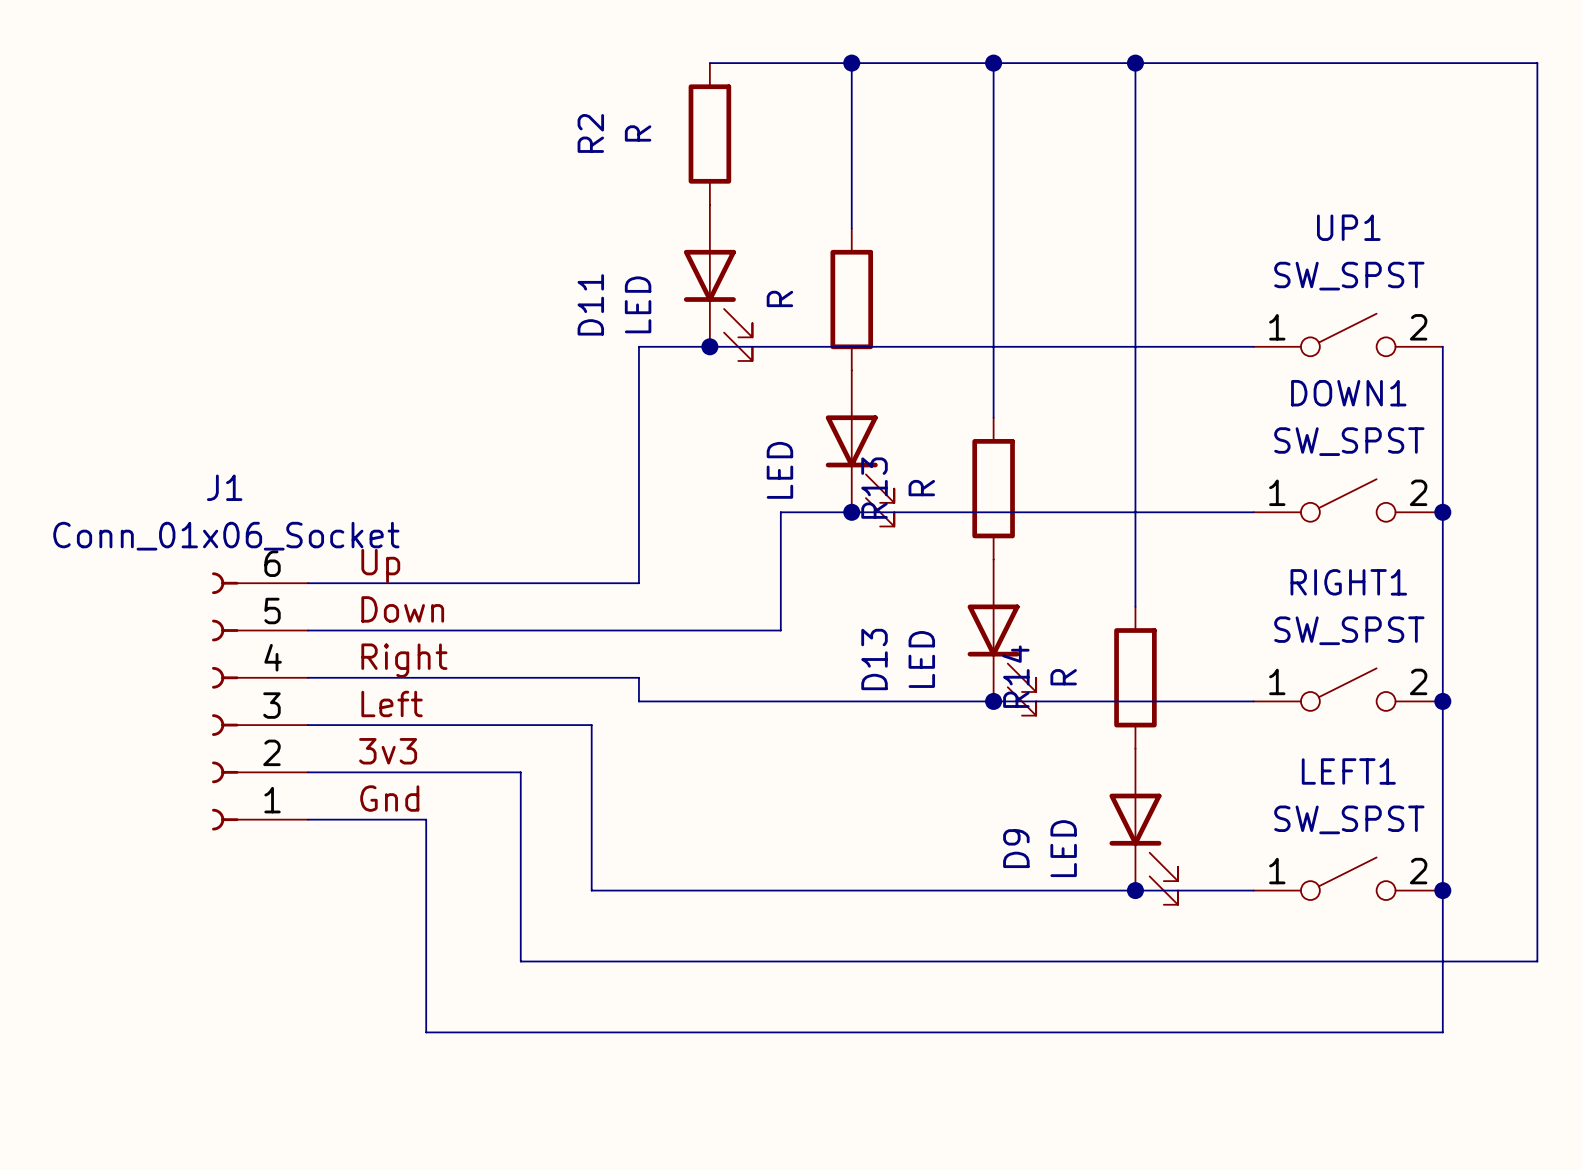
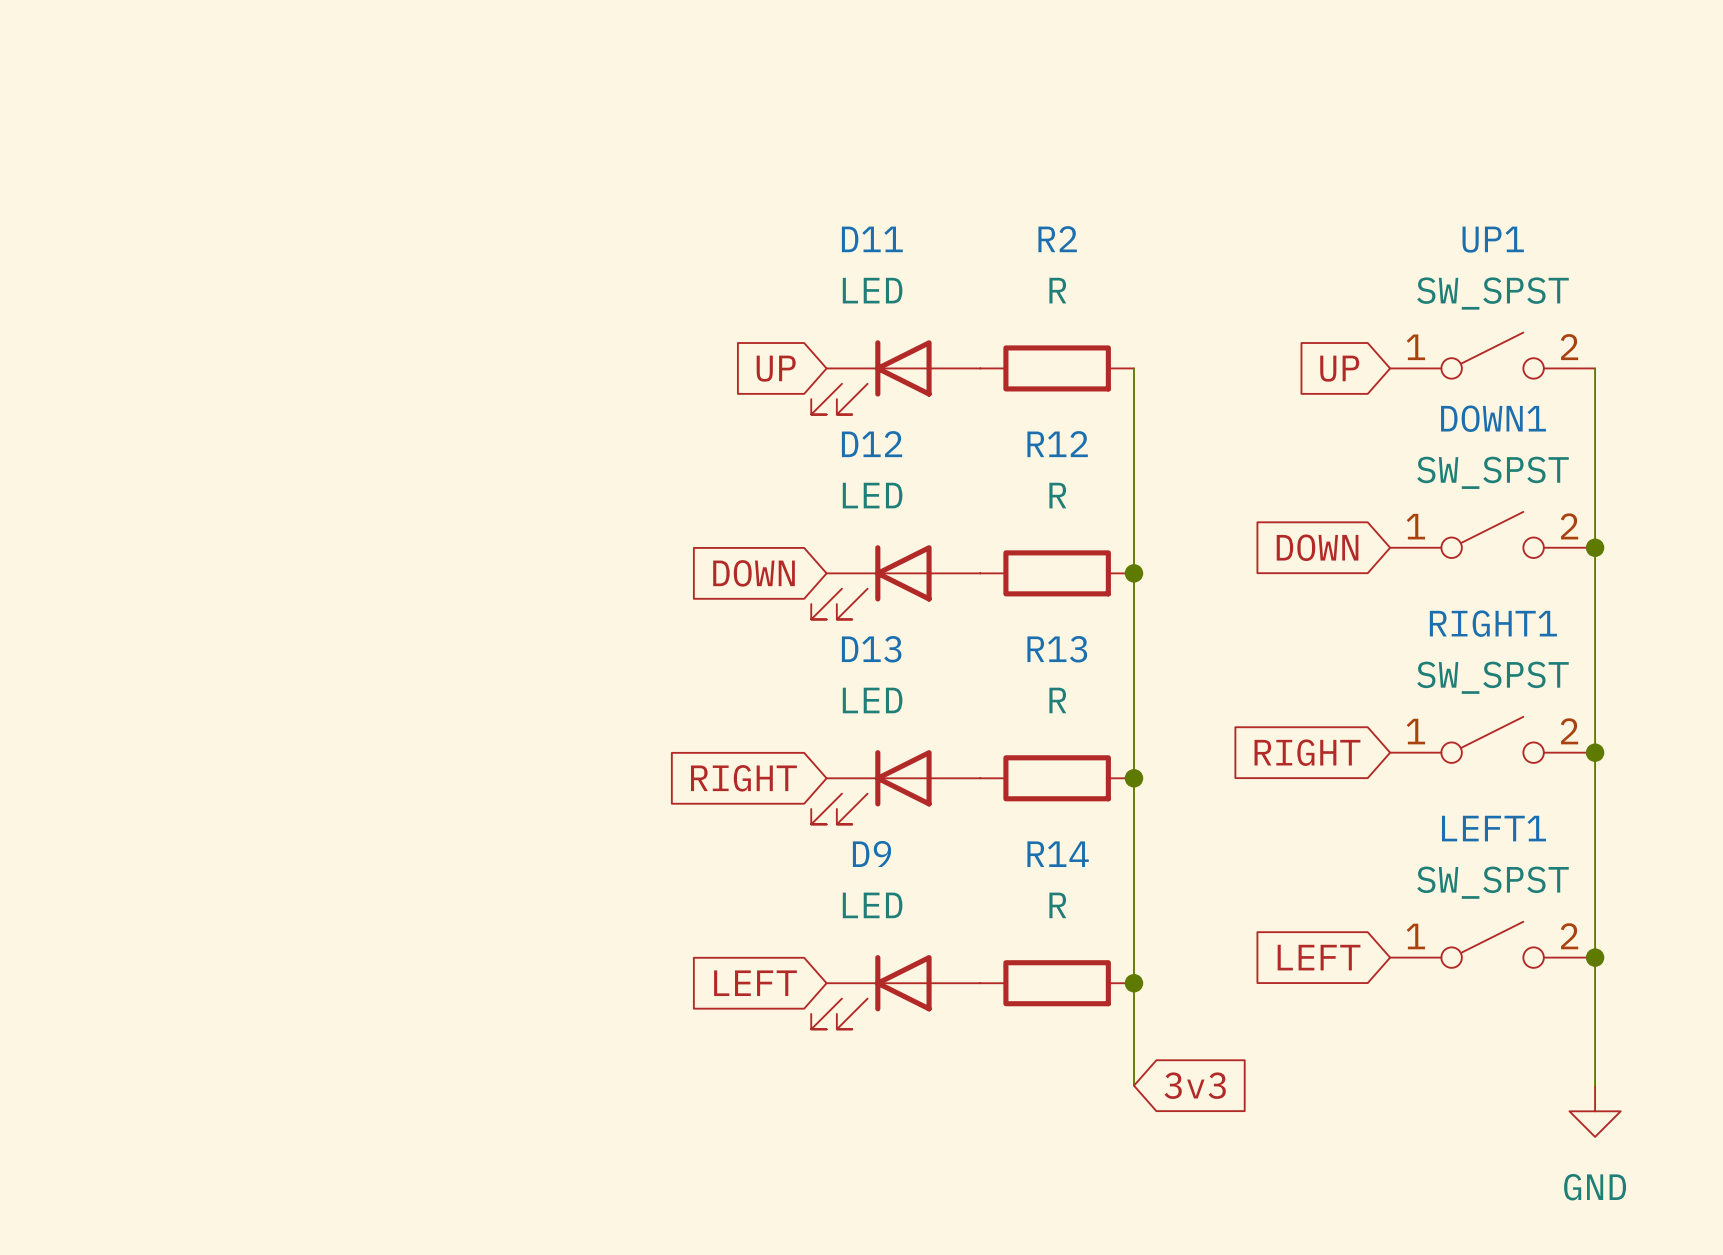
wire: (709, 63) (1537, 63) (1537, 961) (520, 961) (520, 772) (307, 772) -> none
wire: (851, 63) (851, 228) -> none
junction: (851, 63) -> none
wire: (993, 63) (993, 417) -> none
junction: (993, 63) -> none
wire: (1135, 63) (1135, 606) -> none
junction: (1135, 63) -> none
R2 rotation: 0° (709, 134) -> 90° clockwise (1057, 368)
R2 position: (709, 134) -> (1057, 368)
D11 position: (718, 282) -> (895, 377)
part: R (851, 299) -> none
D11 rotation: 0° (718, 305) -> 90° clockwise (871, 377)
global label: none -> UP (776, 368)
junction: (709, 346) -> none
wire: none -> (1133, 368) (1133, 1085)
global label: none -> UP (1339, 368)
wire: (1253, 346) (638, 346) (638, 583) (307, 583) -> none
part: LED (860, 448) -> none
R13 rotation: 0° (993, 488) -> 90° clockwise (1057, 778)
R13 position: (993, 488) -> (1057, 778)
junction: (851, 512) -> none
global label: none -> DOWN (1317, 547)
wire: (1253, 512) (780, 512) (780, 630) (307, 630) -> none
global label: none -> DOWN (754, 573)
R12: none -> R (1057, 573)
junction: none -> (1133, 573)
D12: none -> LED (895, 582)
label: Up (380, 566) -> none
label: Down (402, 609) -> none
D13 position: (1001, 637) -> (895, 787)
label: Right (404, 660) -> none
D13 rotation: 0° (1001, 660) -> 90° clockwise (871, 787)
wire: (307, 677) (638, 677) (638, 701) (1253, 701) -> none
R14 rotation: 0° (1135, 677) -> 90° clockwise (1057, 983)
R14 position: (1135, 677) -> (1057, 983)
J1: Conn_01x06_Socket (259, 701) -> none
junction position: (993, 701) -> (1133, 778)
global label: none -> RIGHT (1307, 752)
label: Left (392, 703) -> none
wire: (307, 725) (591, 725) (591, 890) (1253, 890) -> none
global label: none -> RIGHT (743, 778)
label: 3v3 (388, 751) -> none
label: Gnd (389, 798) -> none
wire: (307, 819) (426, 819) (426, 1032) (1442, 1032) (1442, 1008) -> none
D9 position: (1143, 826) -> (895, 992)
D9 rotation: 0° (1143, 849) -> 90° clockwise (871, 992)
junction: (1135, 890) -> none
global label: none -> LEFT (1319, 957)
global label: none -> LEFT (755, 983)
junction: none -> (1133, 983)
global label: none -> 3v3 (1195, 1085)
power symbol: none -> GND (1595, 1111)

